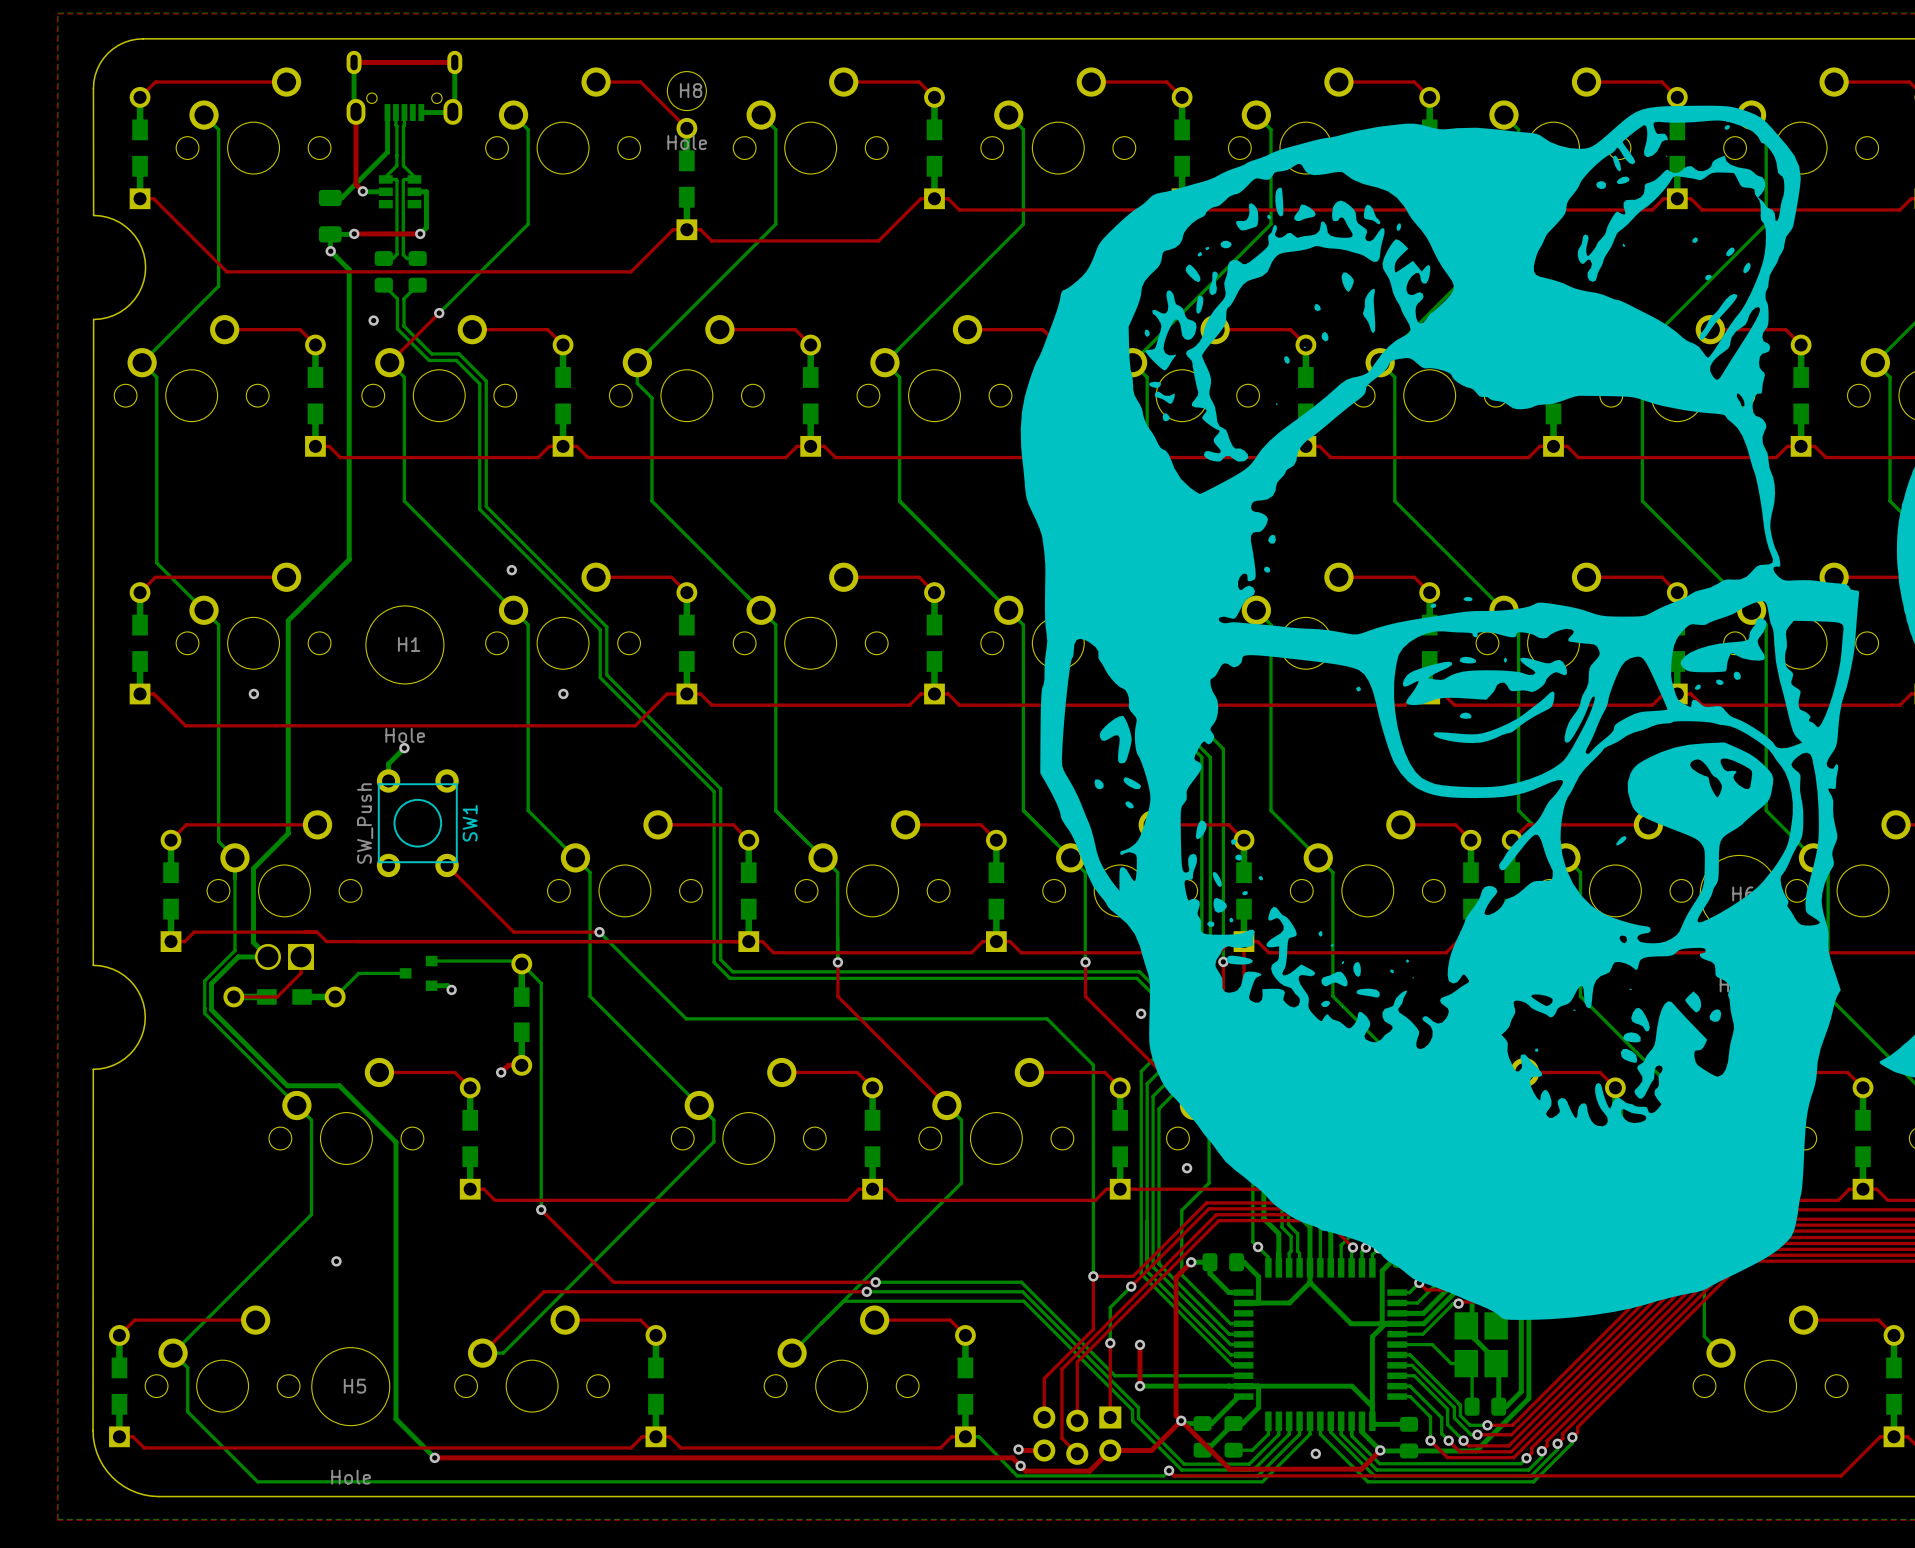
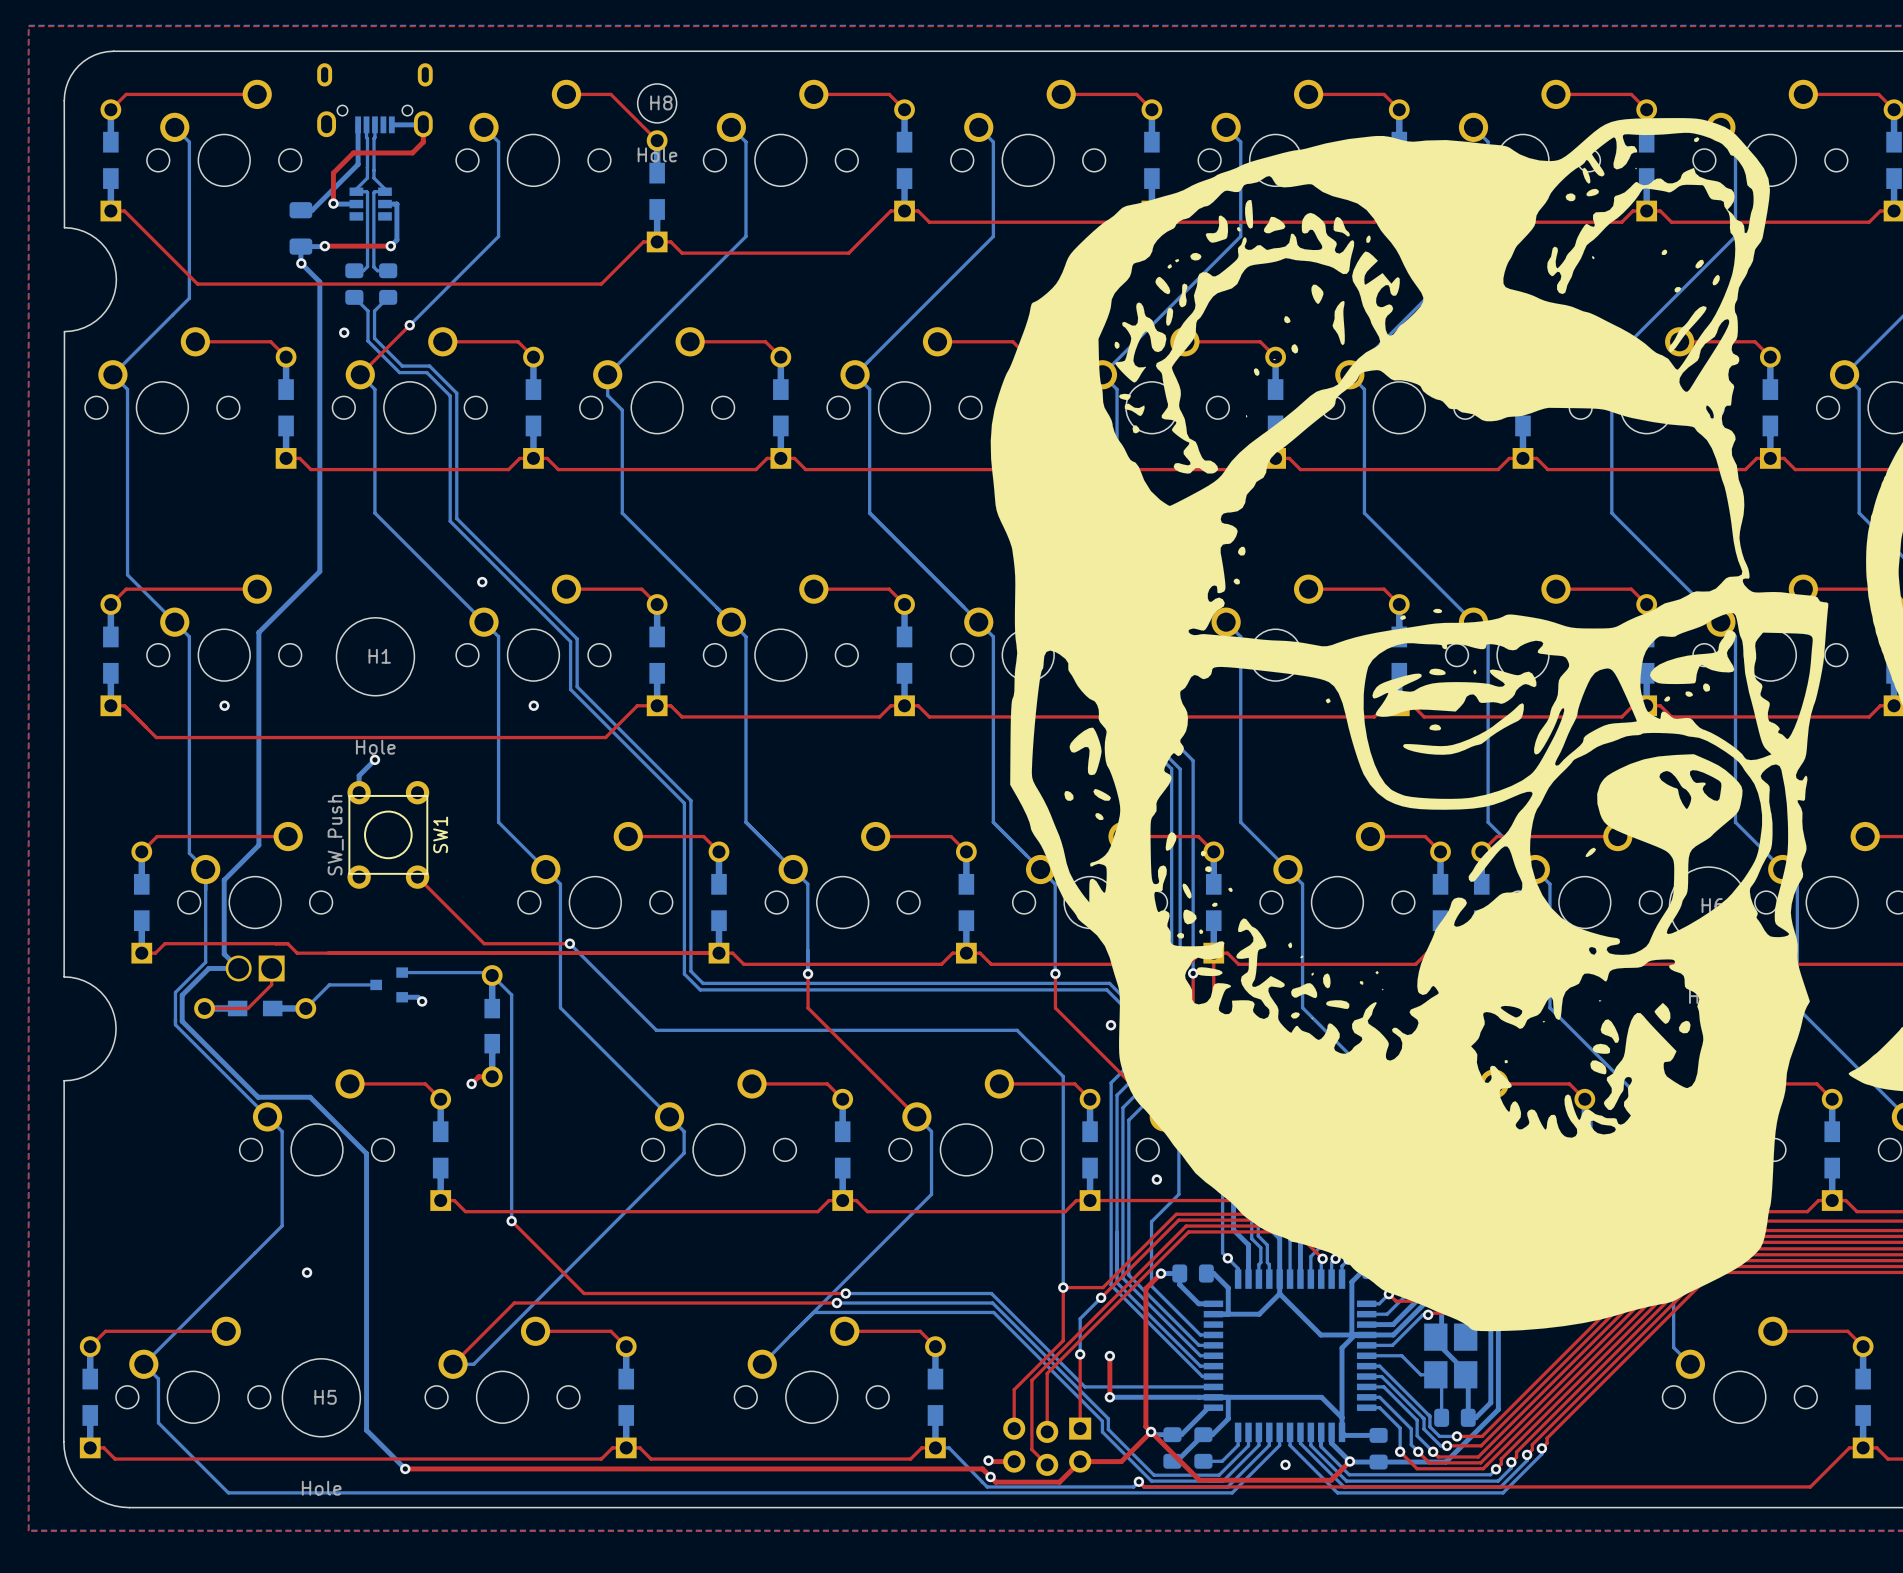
top track: (354, 62) (454, 62) -> none
bottom track: (354, 62) (354, 109) -> none
bottom track: (454, 62) (454, 109) -> none
top track: (356, 111) (356, 184) (362, 191) -> (423, 124) (423, 142) (412, 152) (353, 152) (333, 173) (333, 203)

